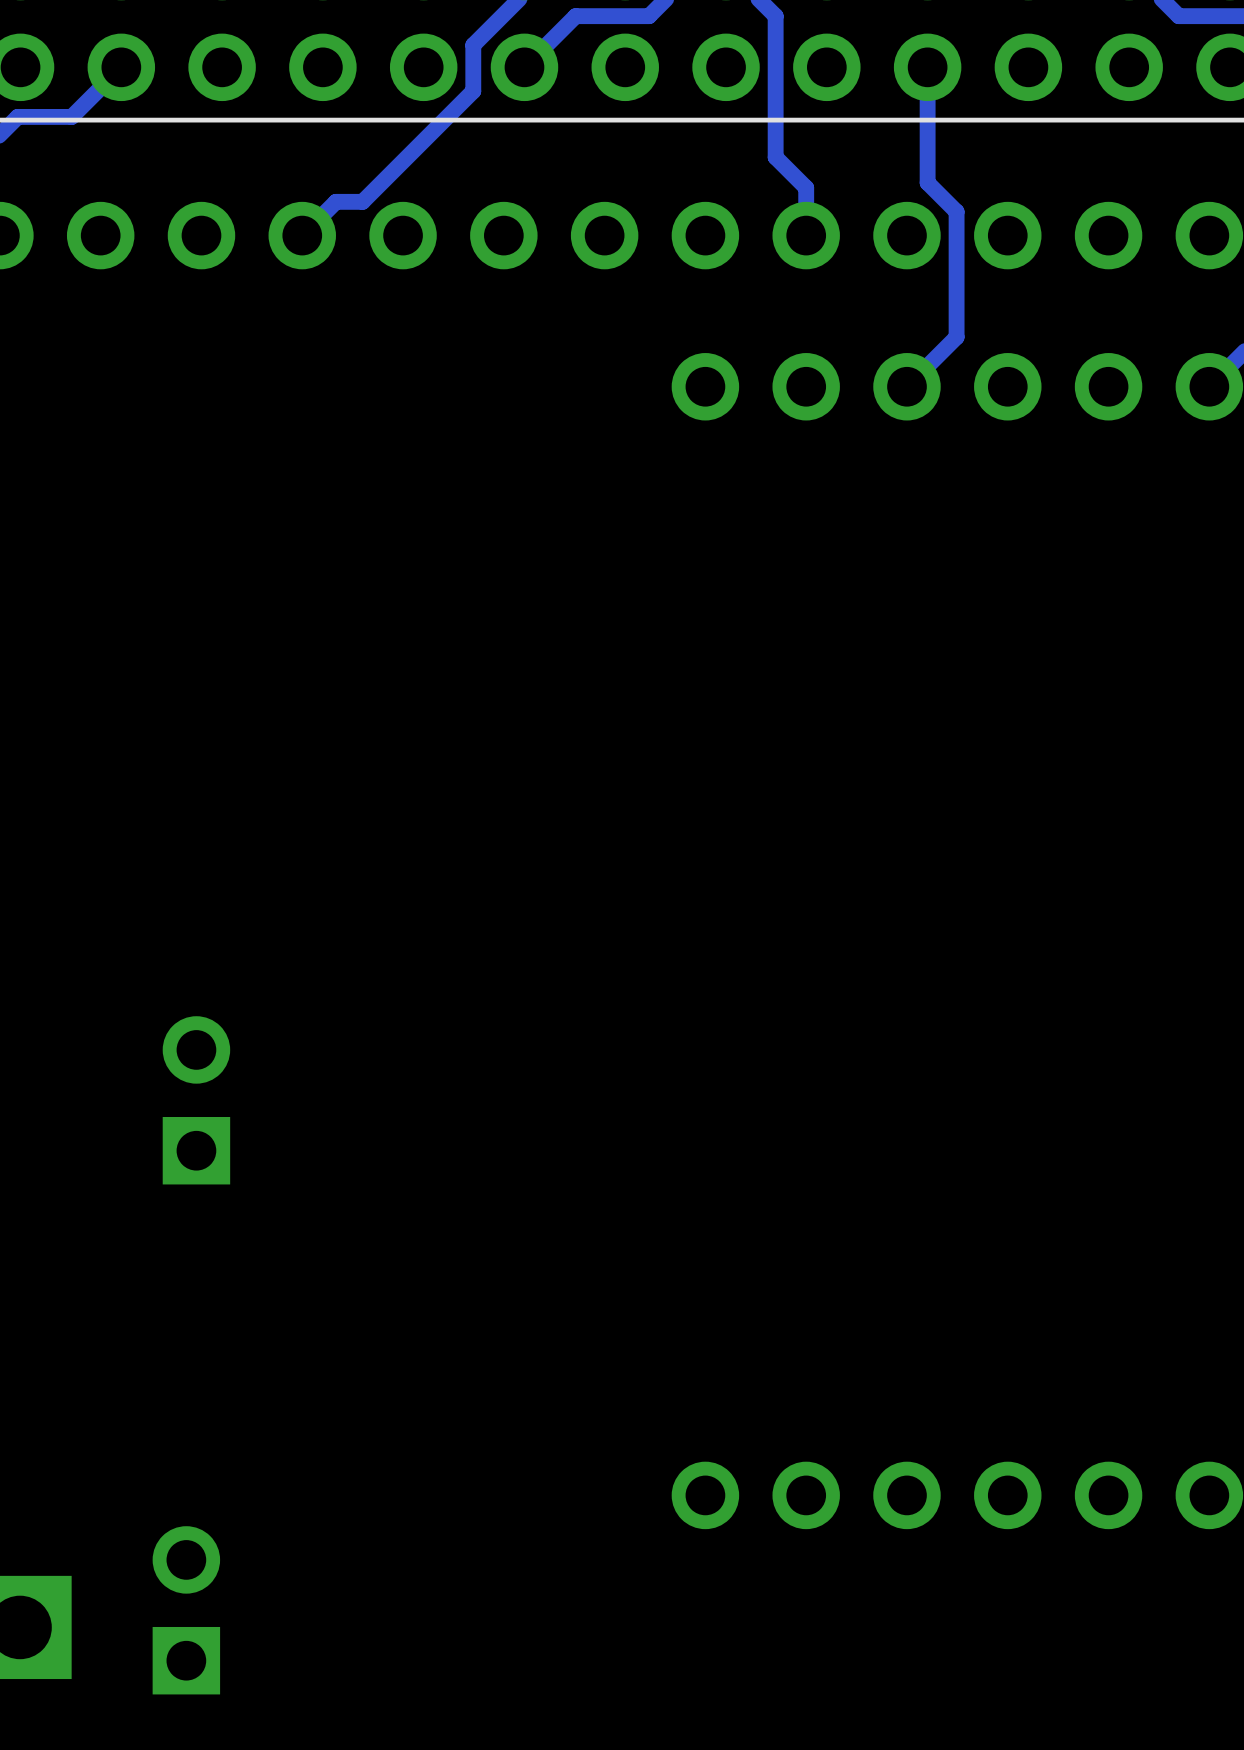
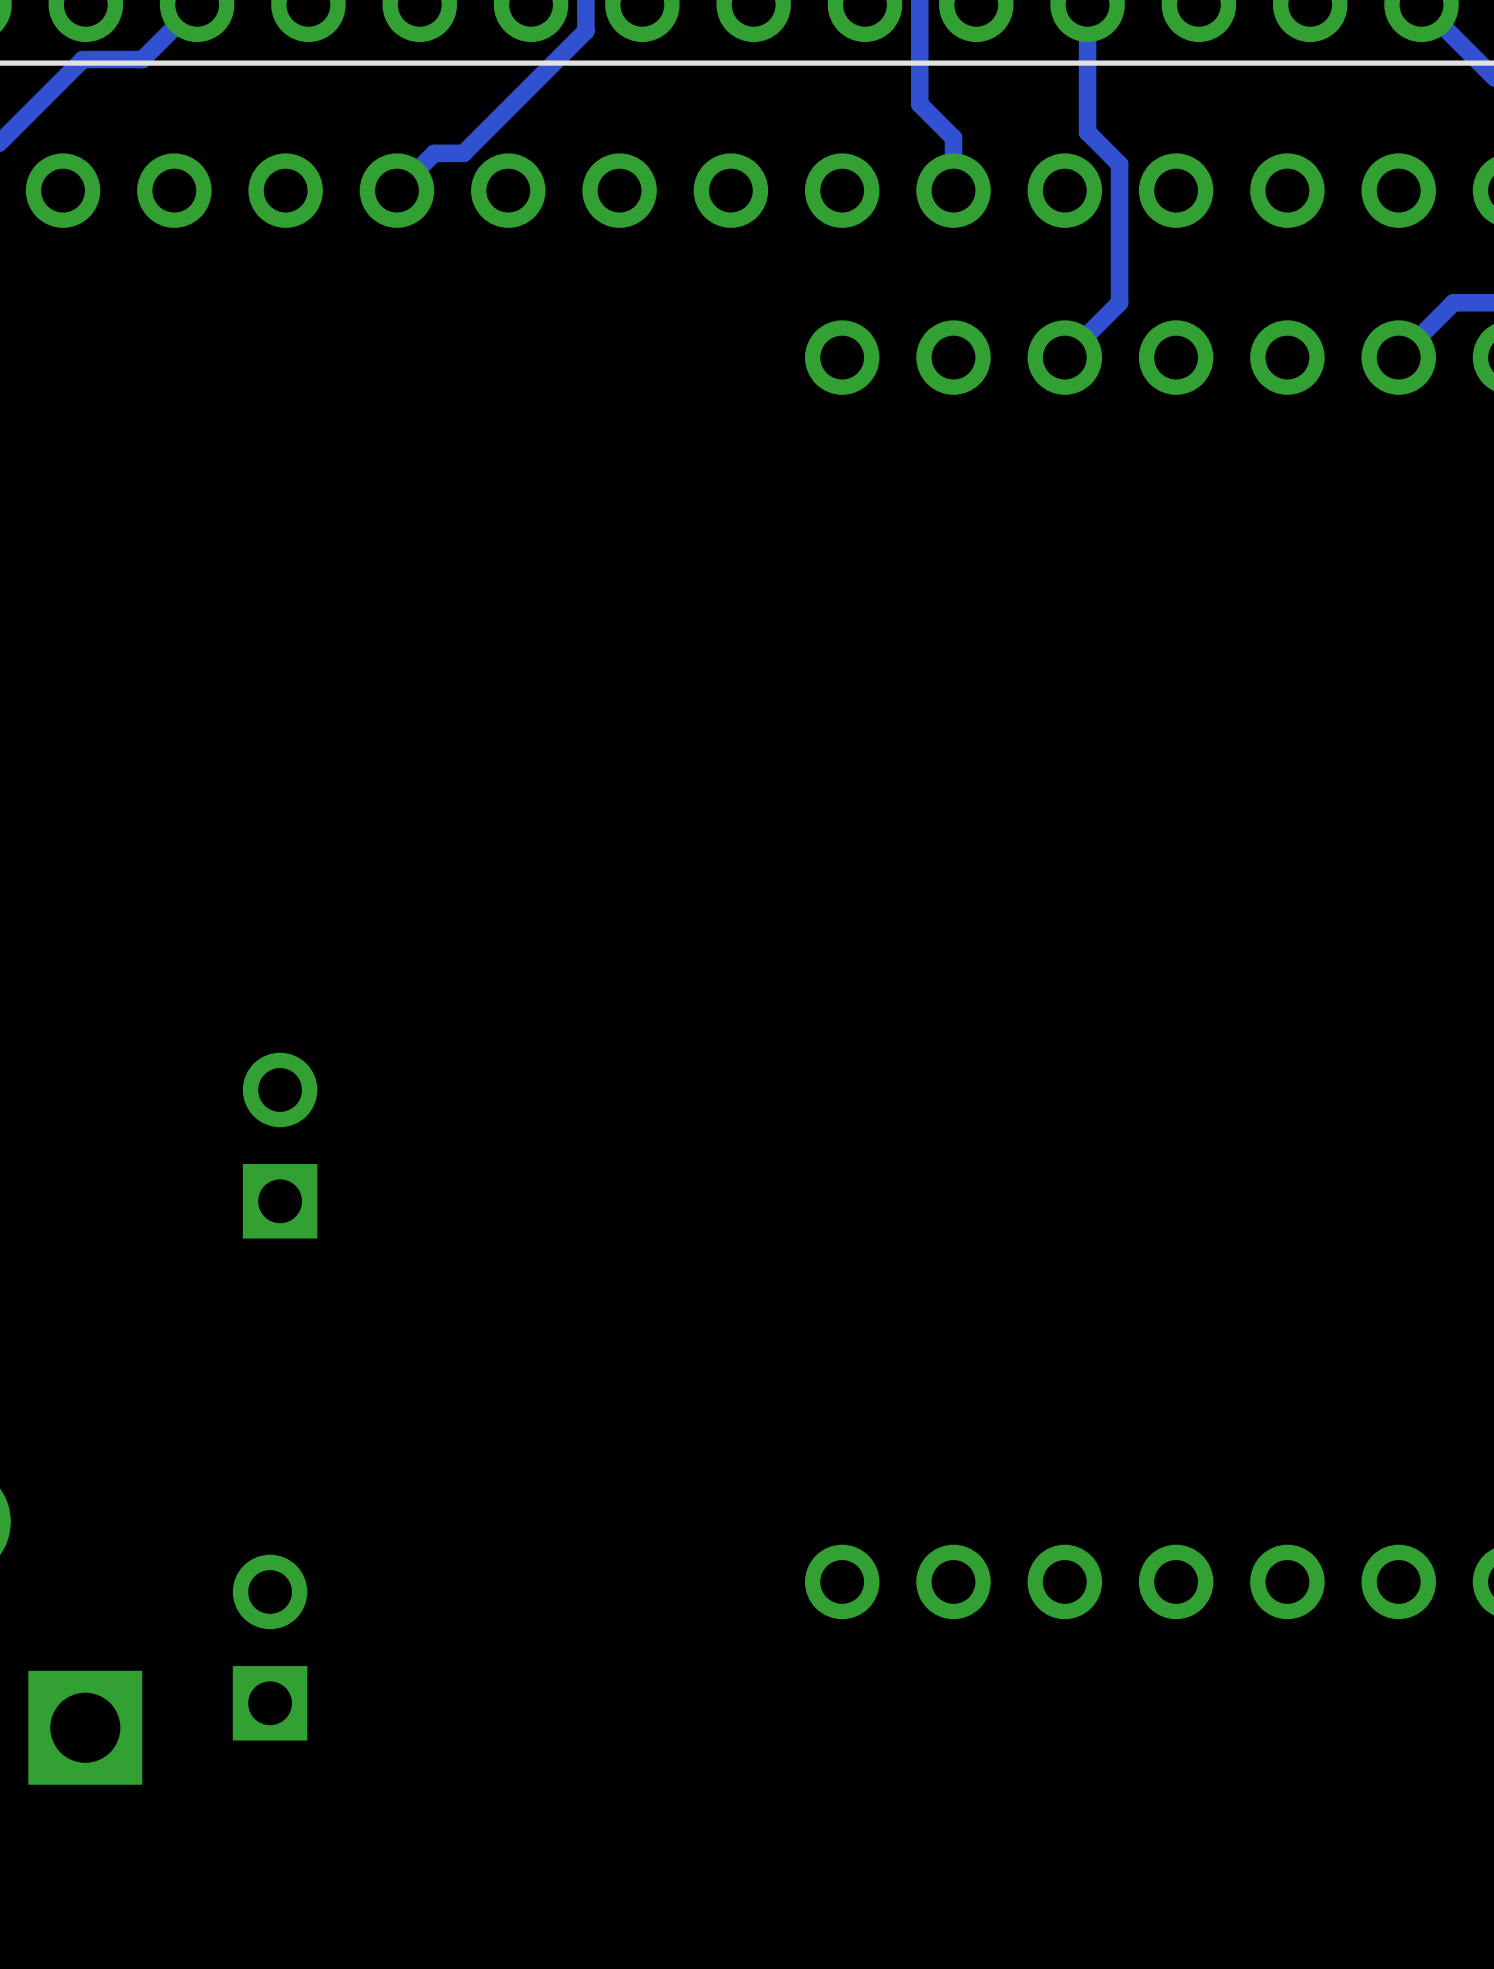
part position: (186, 1610) -> (270, 1647)

